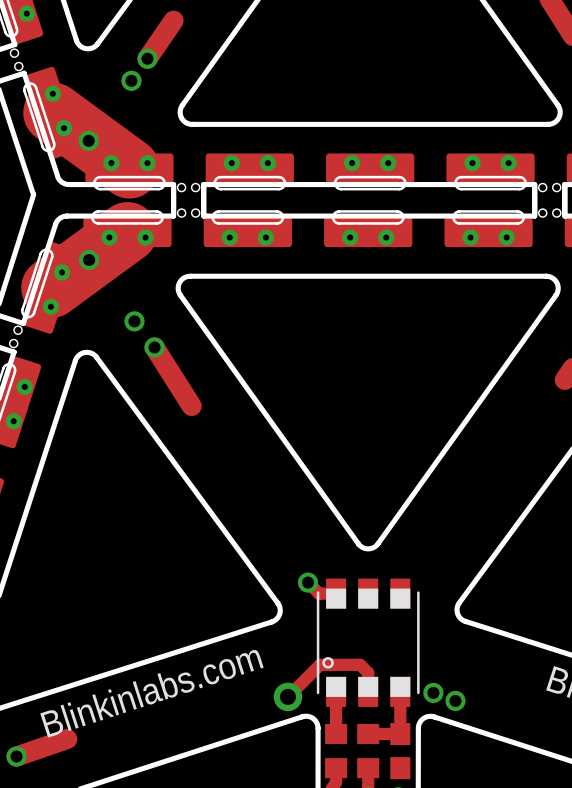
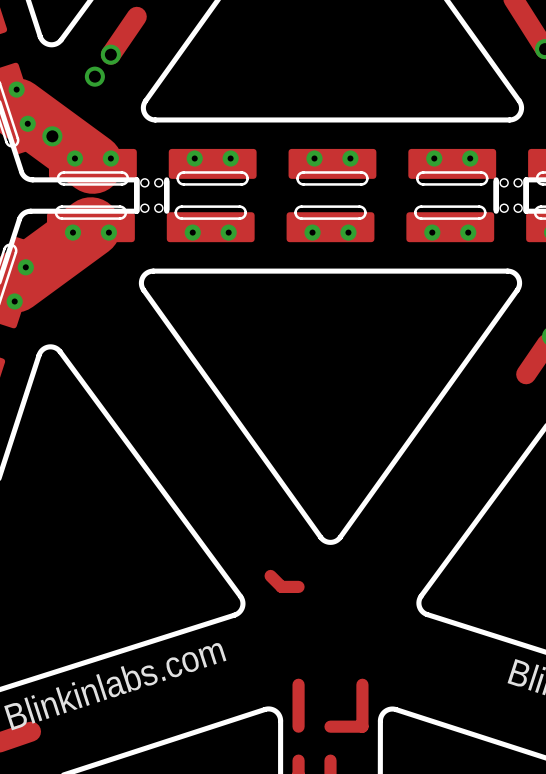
board edge: (203, 184) (534, 184) -> none
board edge: (203, 216) (534, 216) -> none
via: (89, 259) -> none
via: (134, 321) -> none
track: (154, 347) (191, 406) -> none
via: (154, 347) -> none
via: (308, 582) -> none
part: (368, 642) -> none
track: (368, 691) (368, 672) (360, 664) (320, 664) (287, 696) -> none
via: (433, 692) -> none
via: (287, 696) -> none
via: (455, 700) -> none
part: (336, 751) -> none
part: (368, 751) -> none
part: (400, 751) -> none

